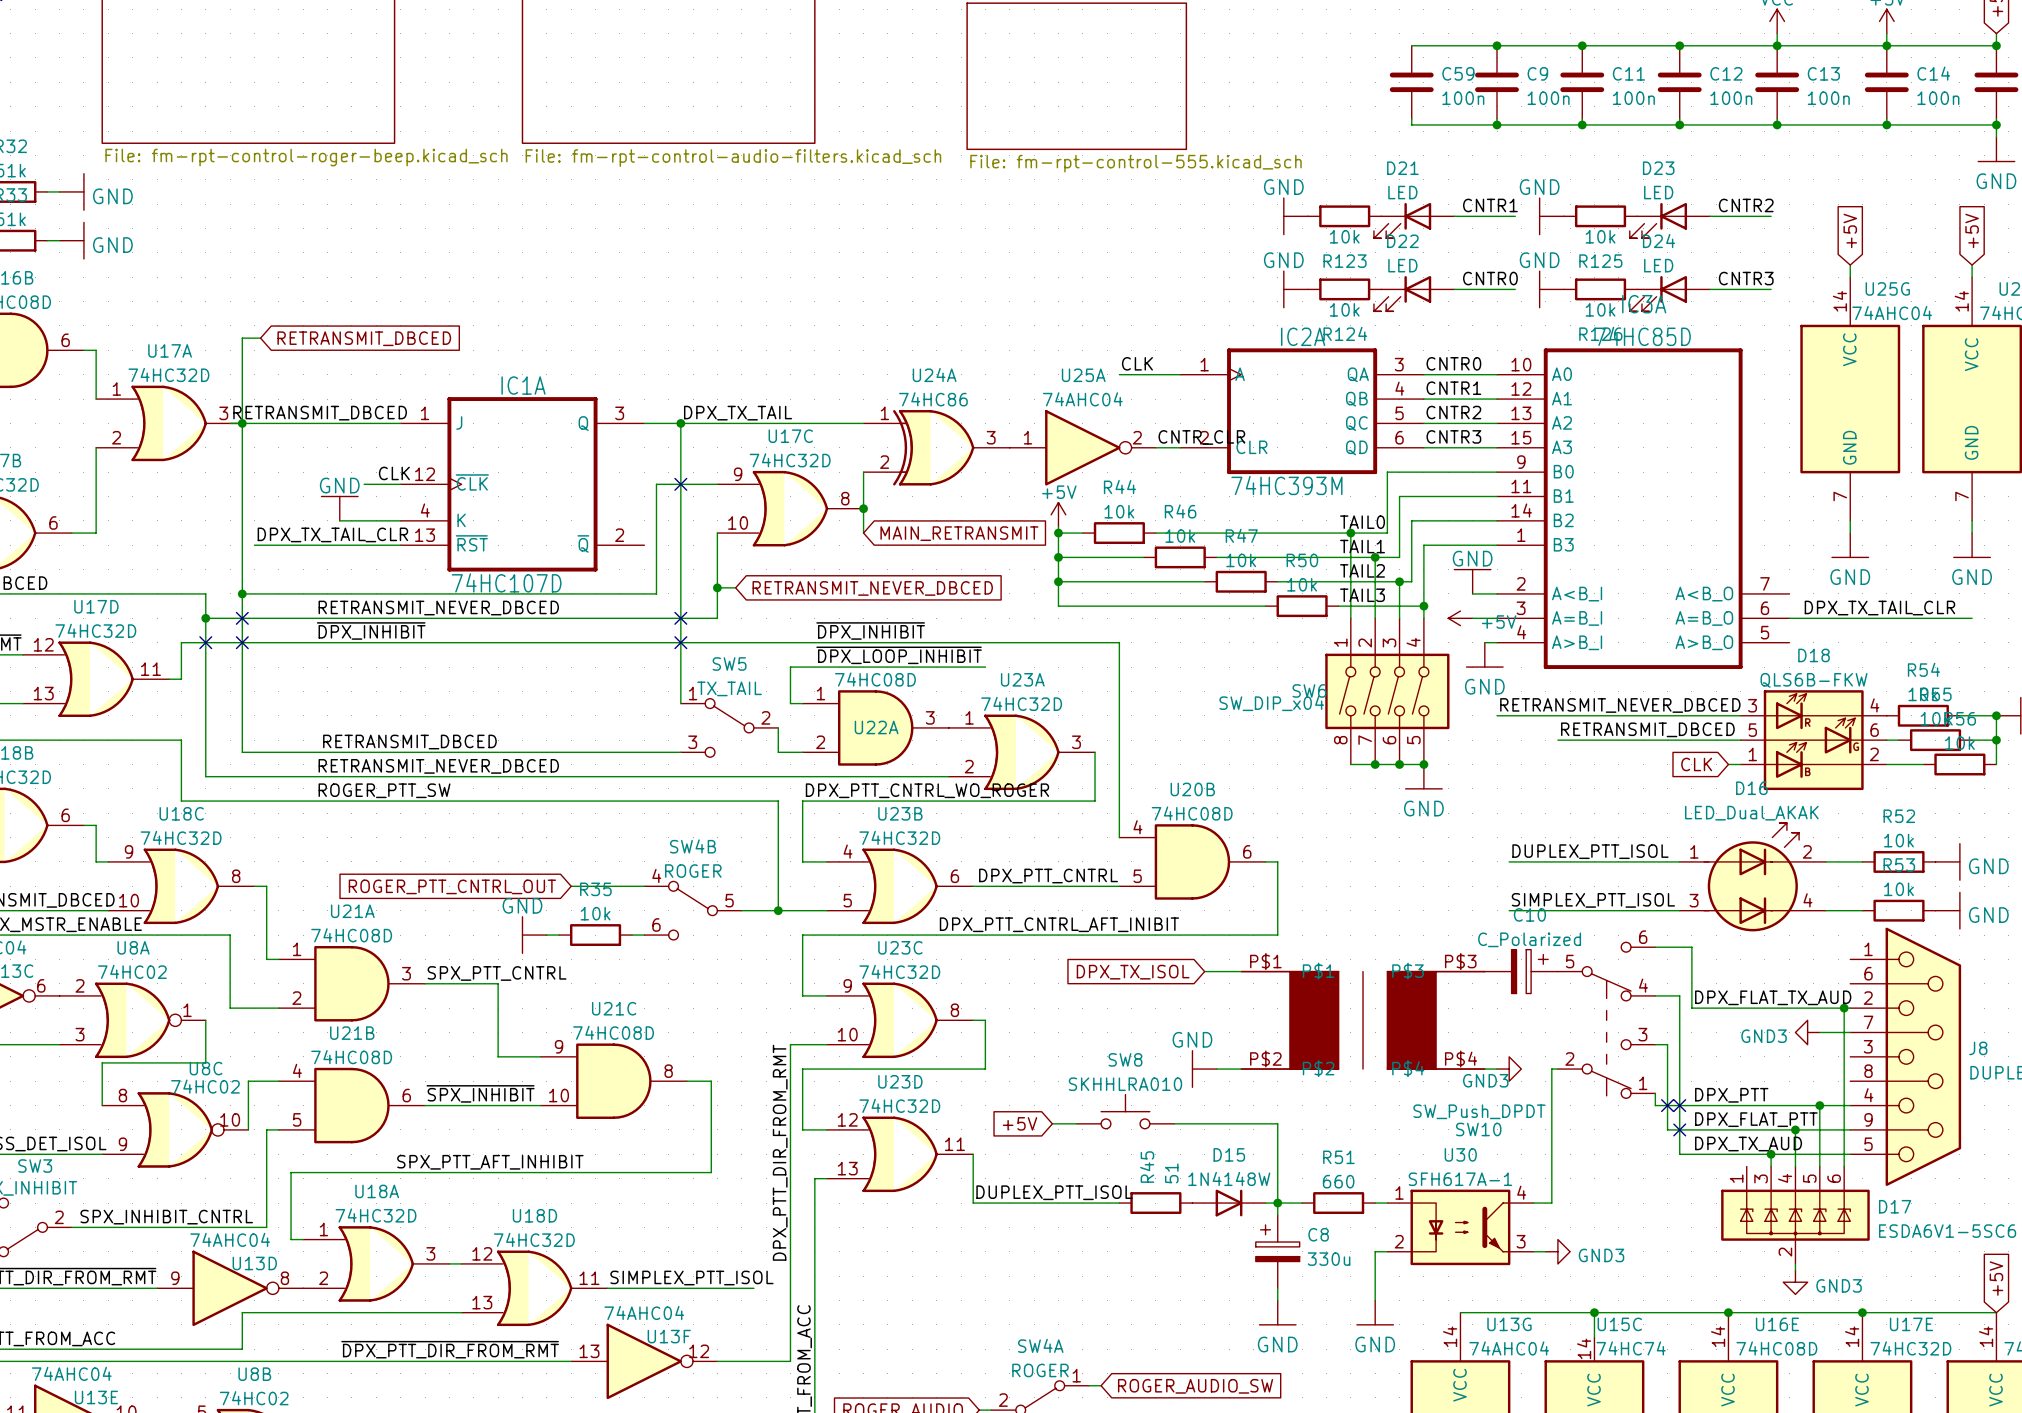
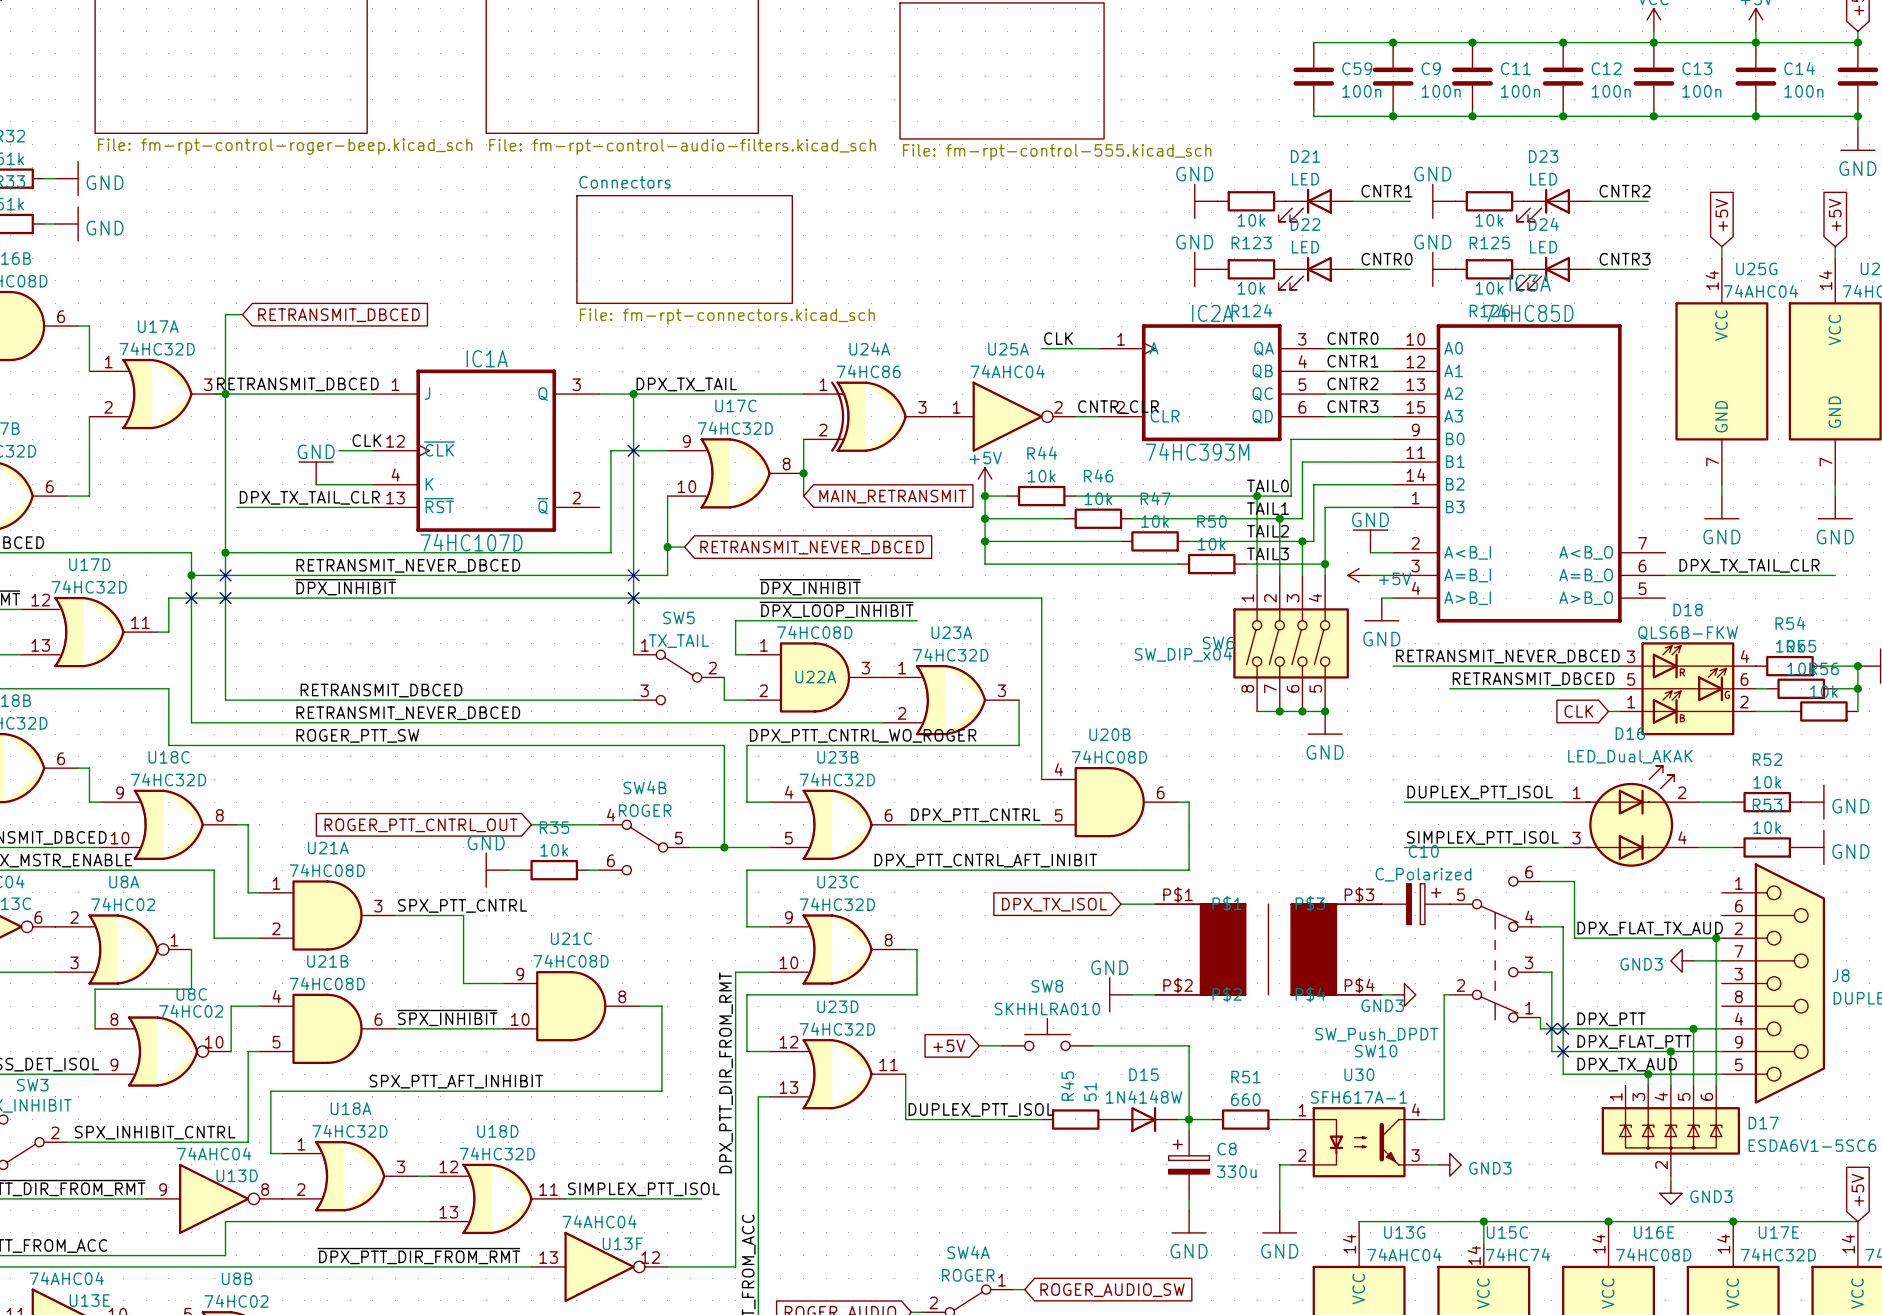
sheet Connectors: none -> File: fm-rpt-connectors.kicad_sch (684, 249)

